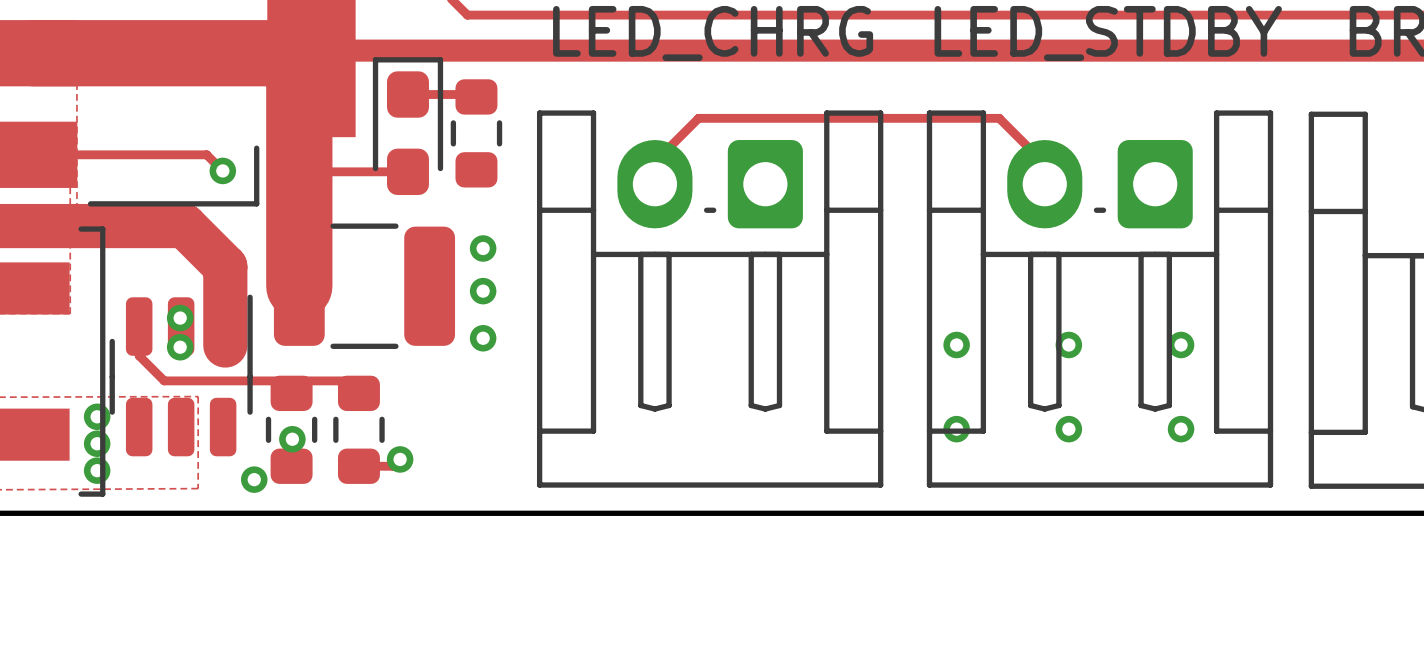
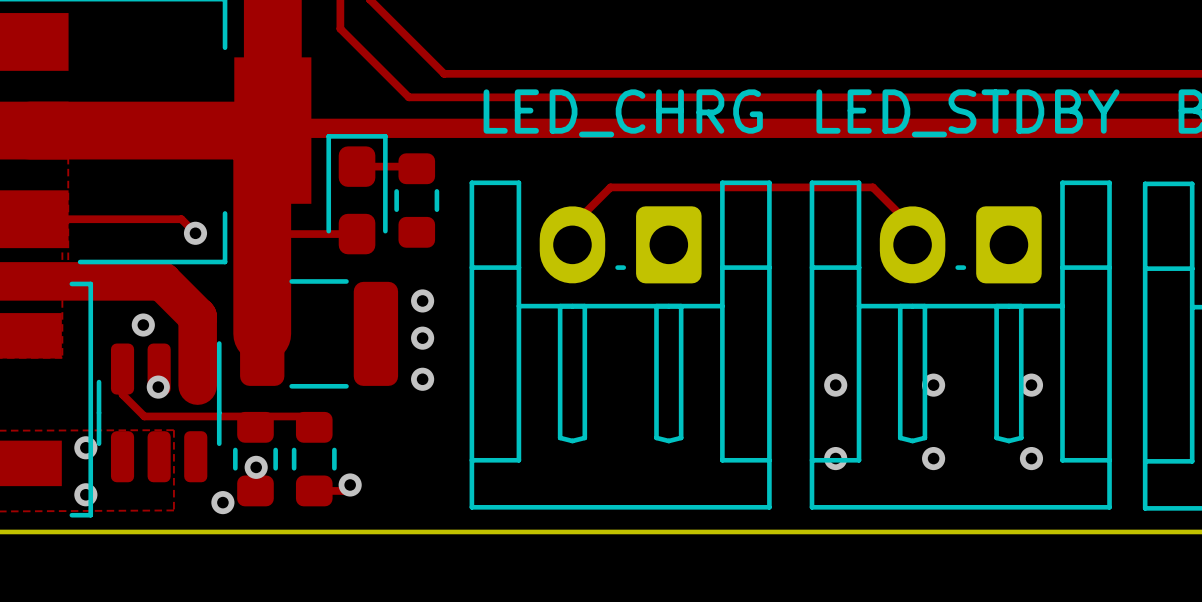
via position: (180, 318) -> (143, 325)
via: (97, 443) -> none

